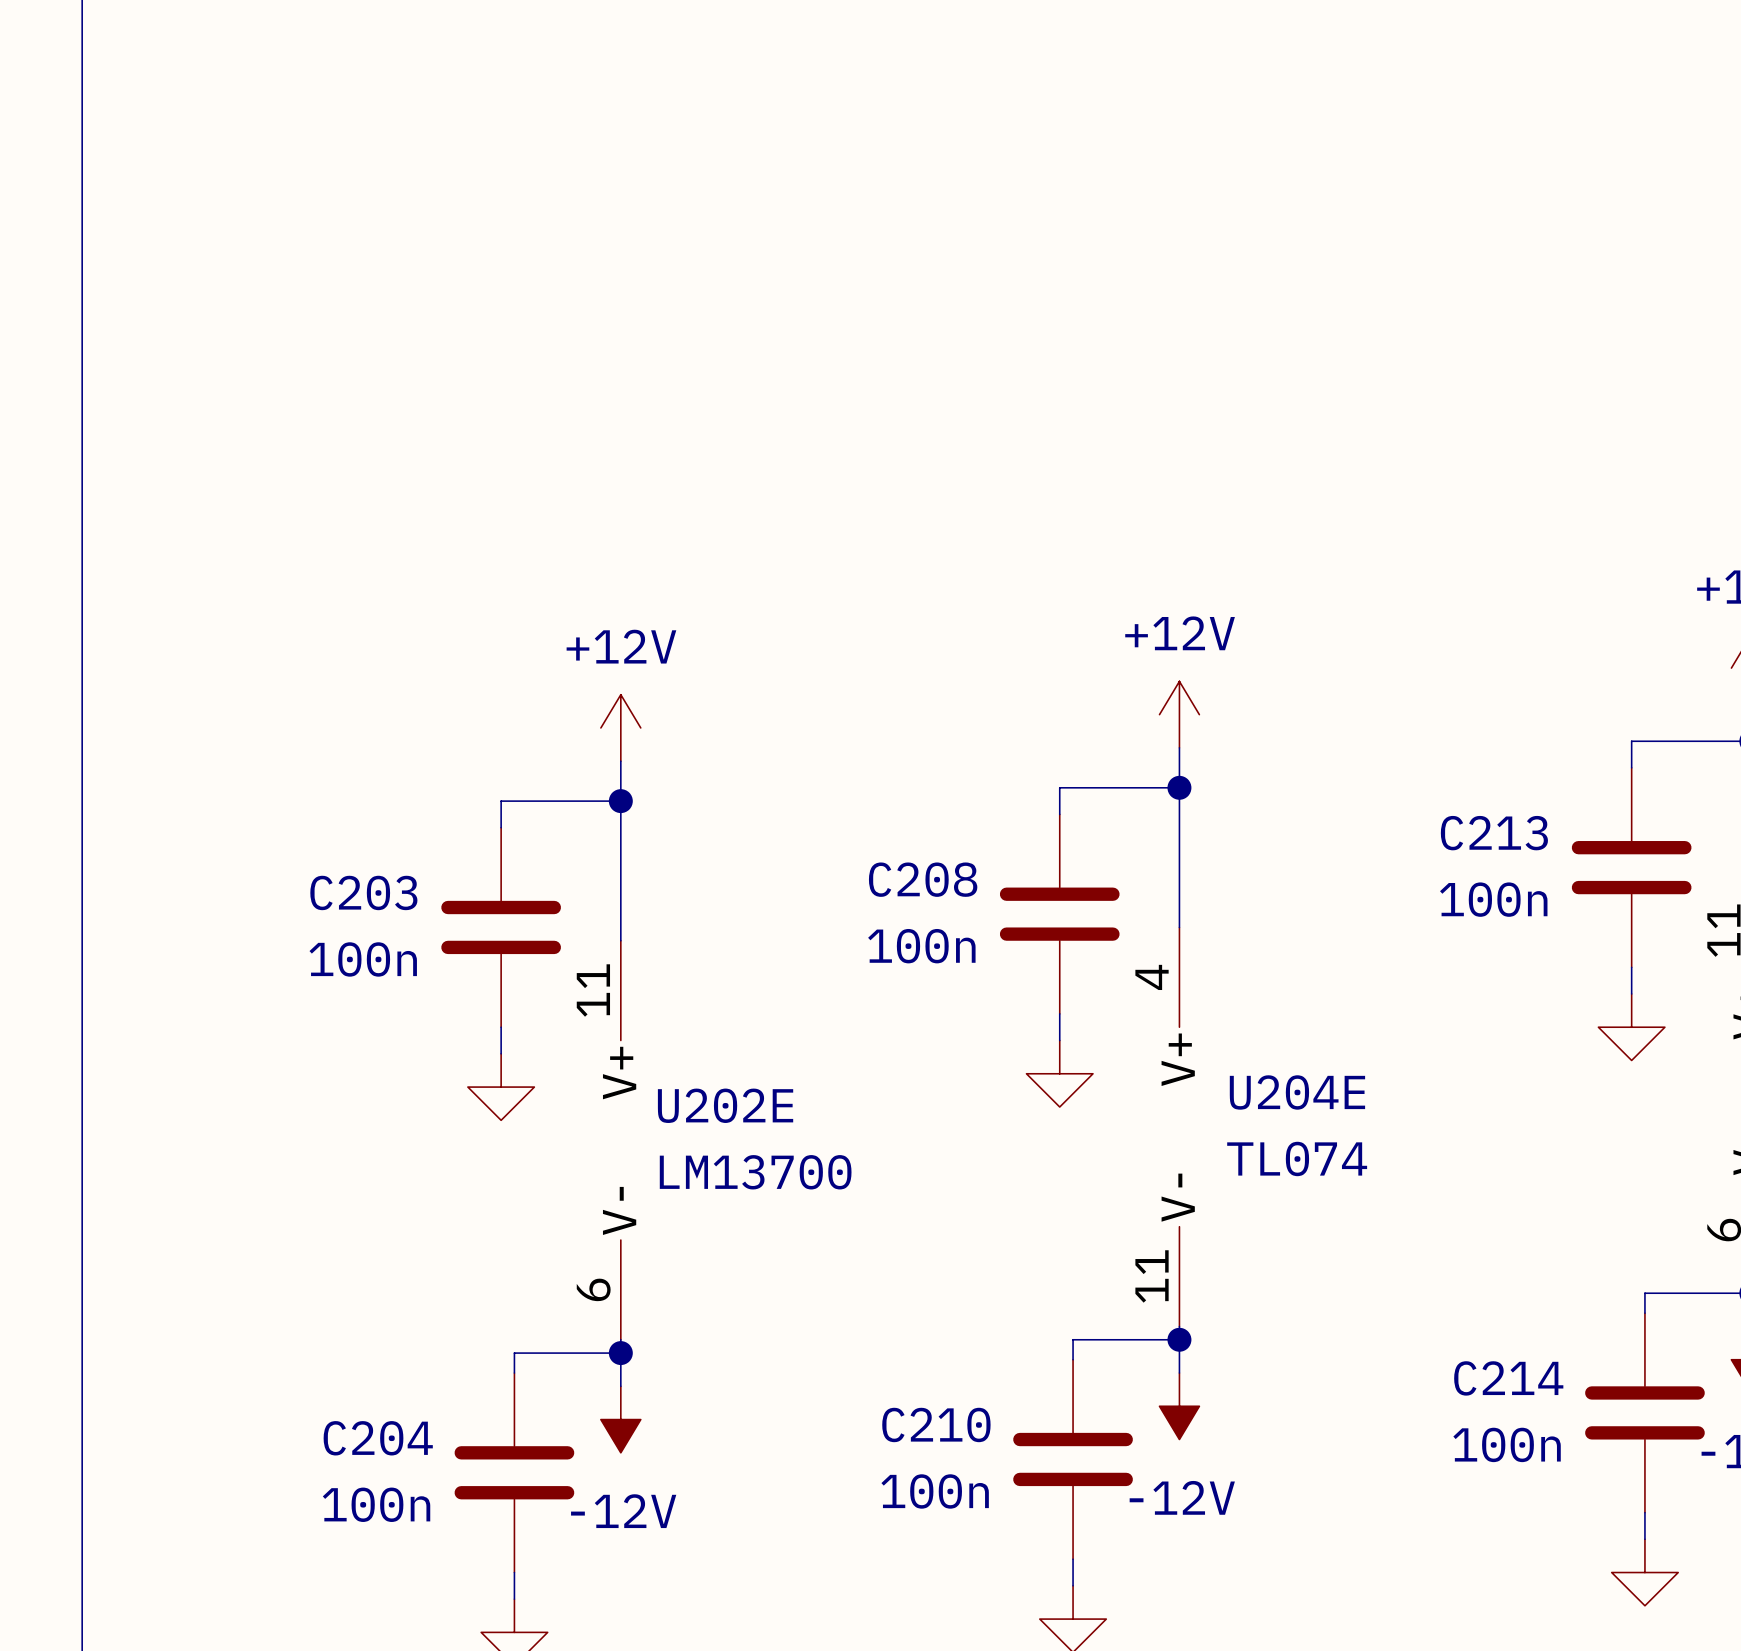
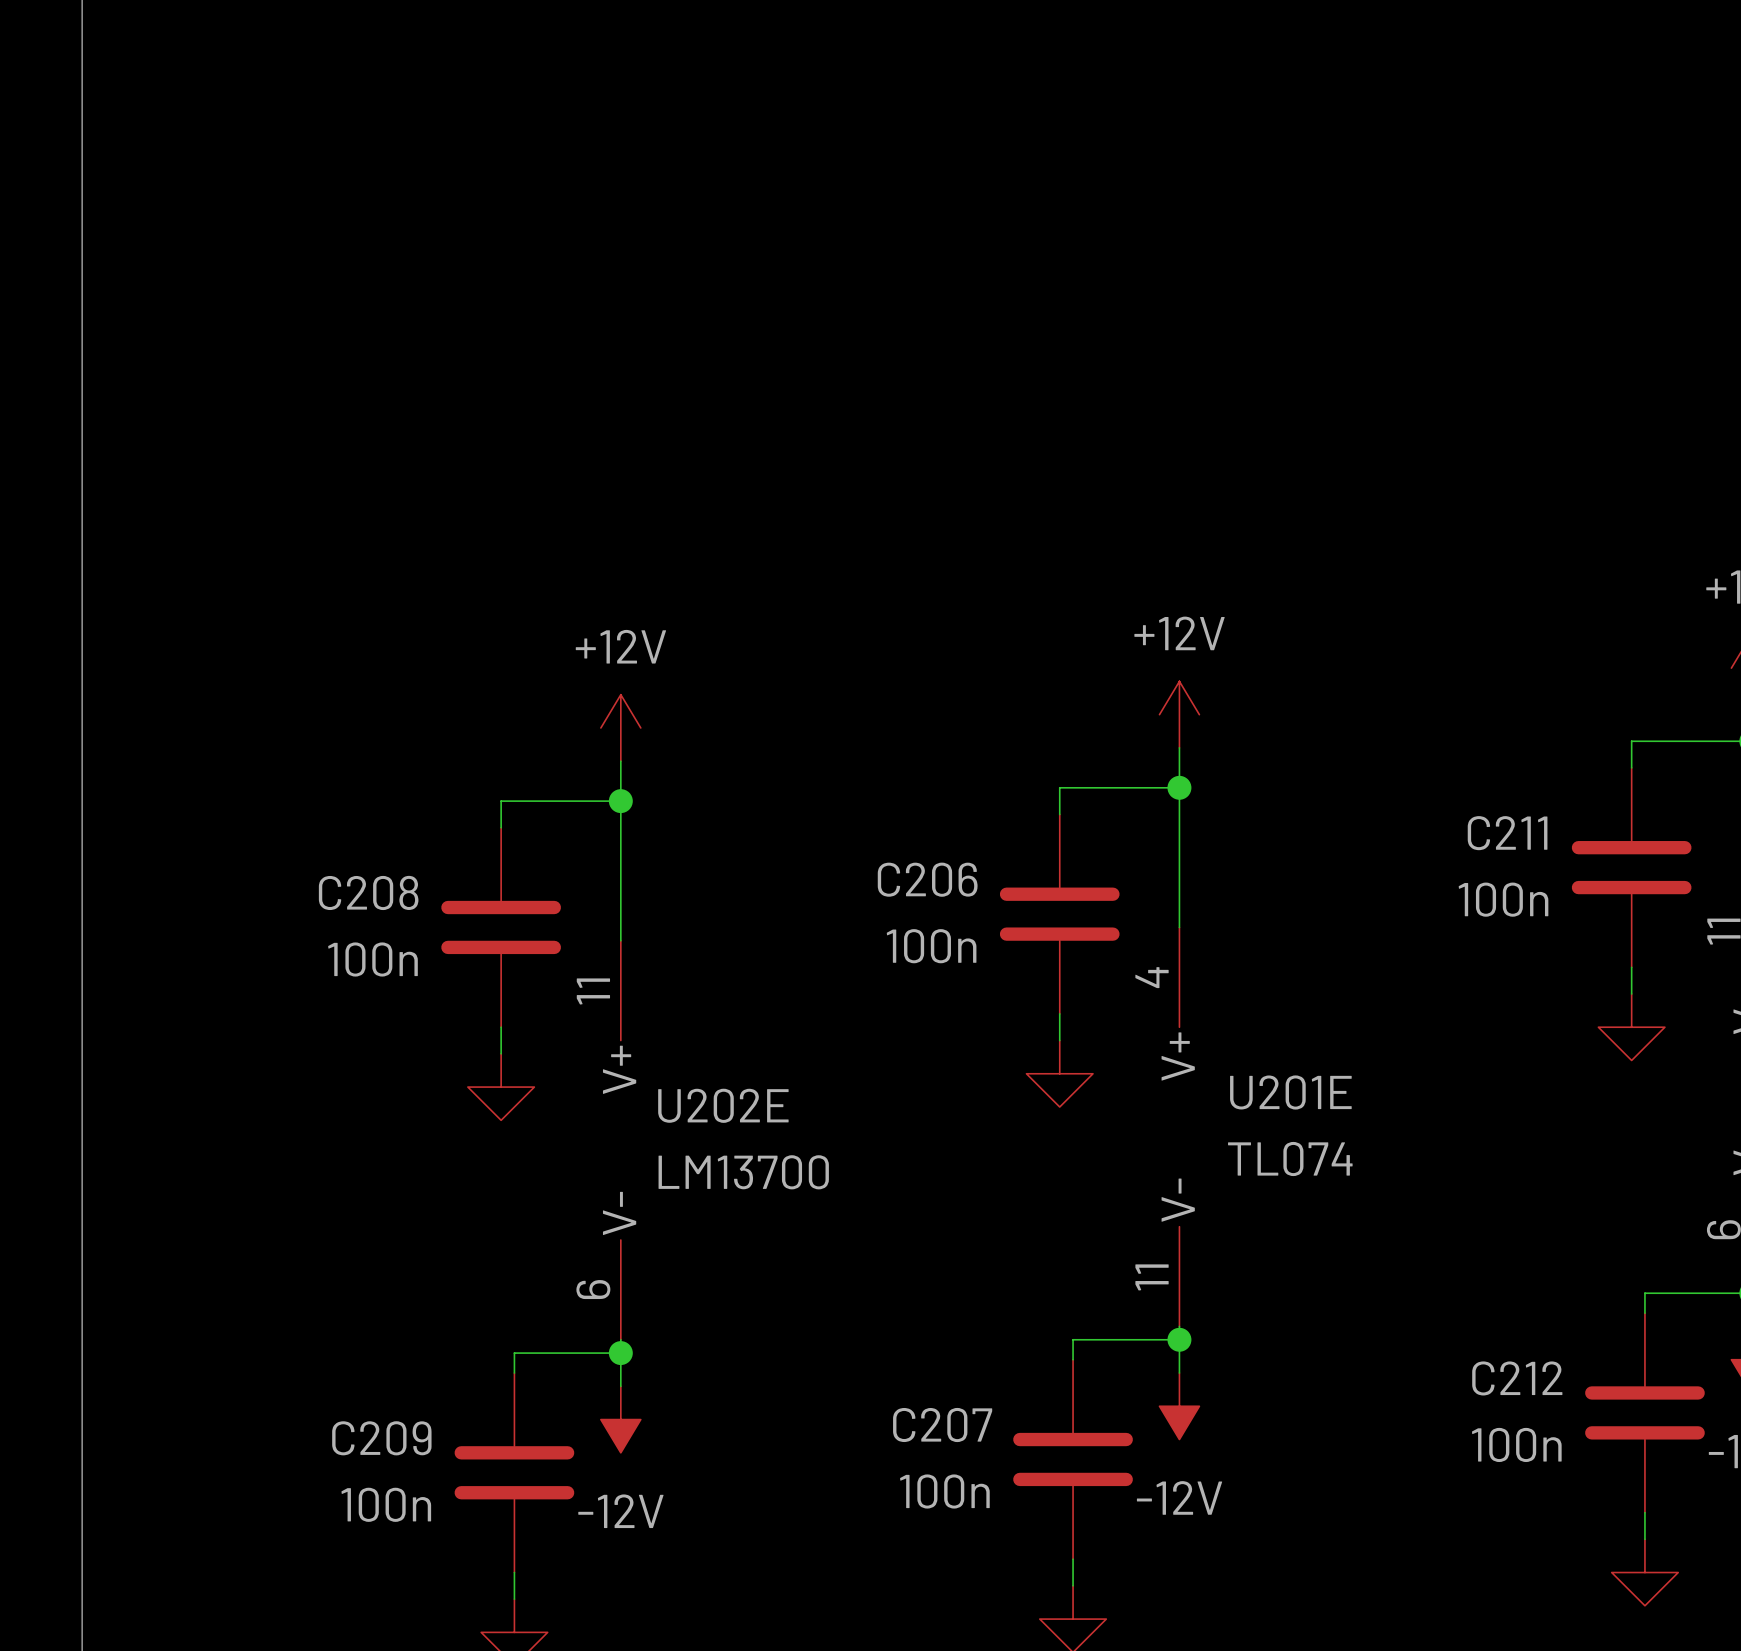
C213 name: C213 (1494, 833) -> C211 (1507, 833)
C208 name: C208 (923, 879) -> C206 (927, 879)
C203 name: C203 (363, 892) -> C208 (368, 892)
U204E name: U204E (1297, 1092) -> U201E (1290, 1092)
C214 name: C214 (1508, 1378) -> C212 (1517, 1378)
C210 name: C210 (936, 1424) -> C207 (942, 1425)
C204 name: C204 (378, 1438) -> C209 (381, 1438)

